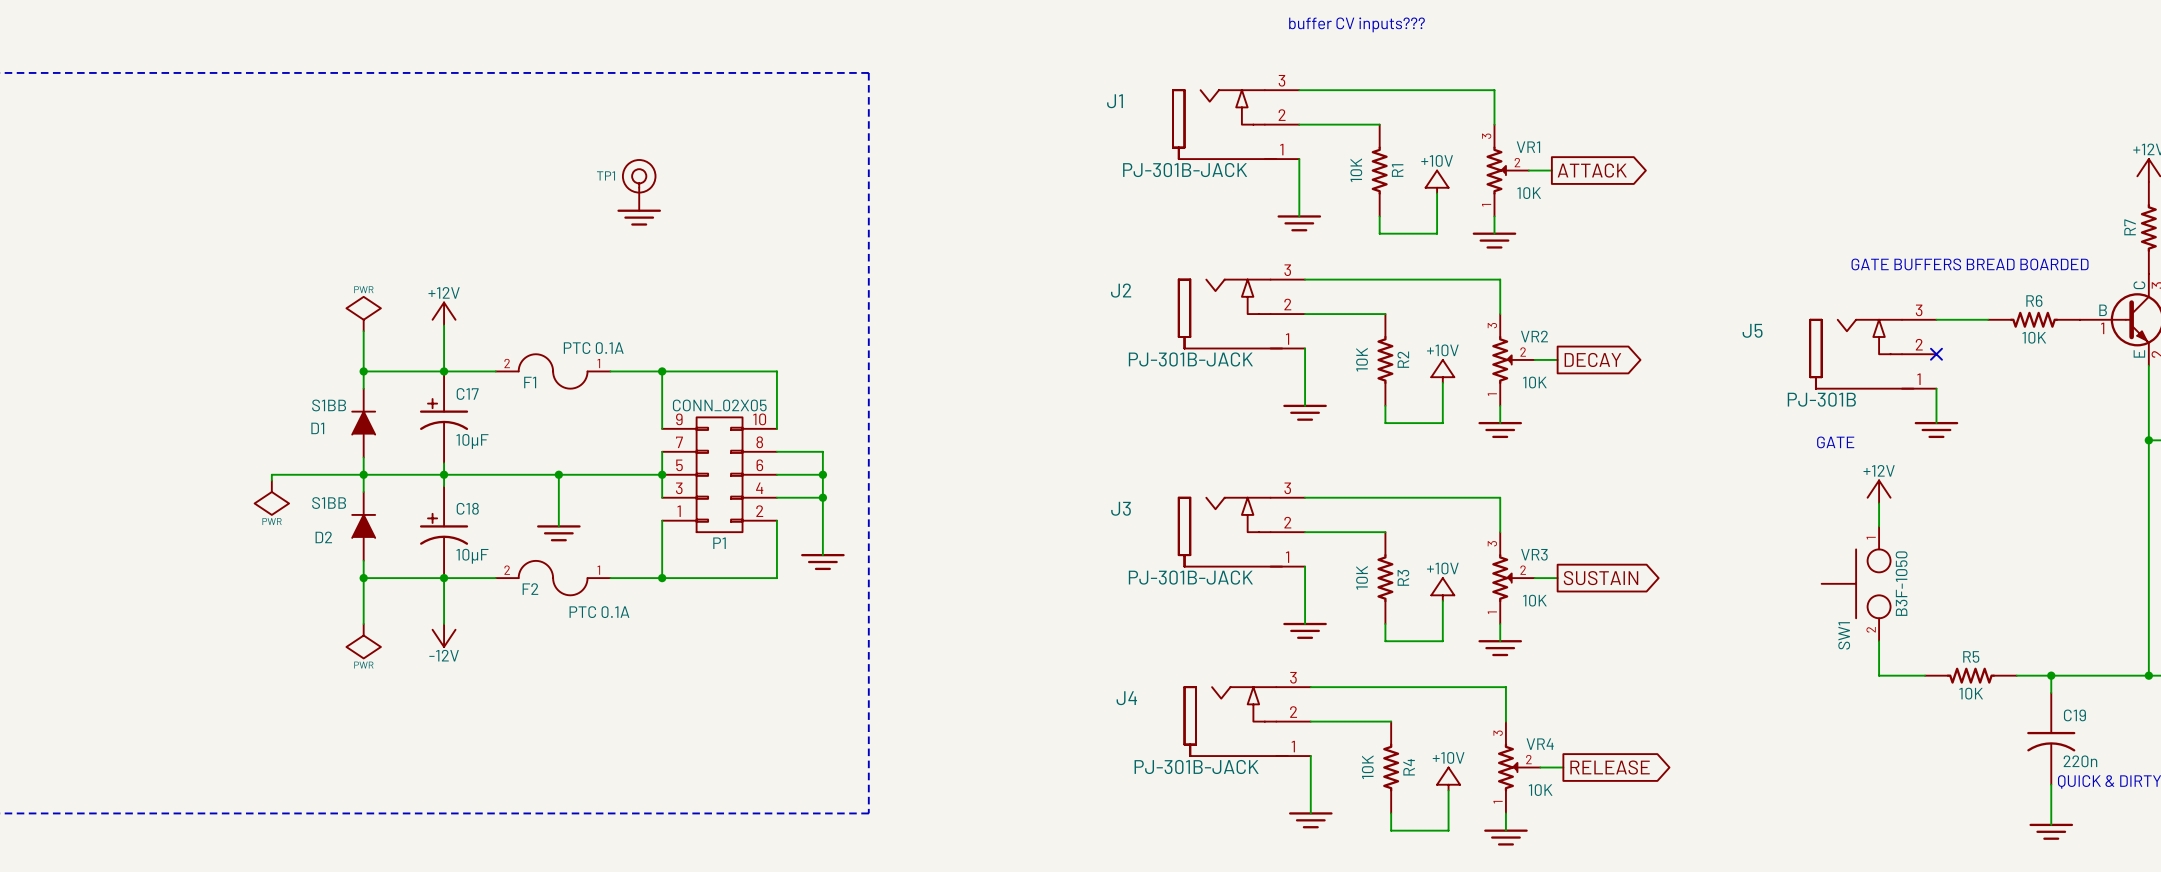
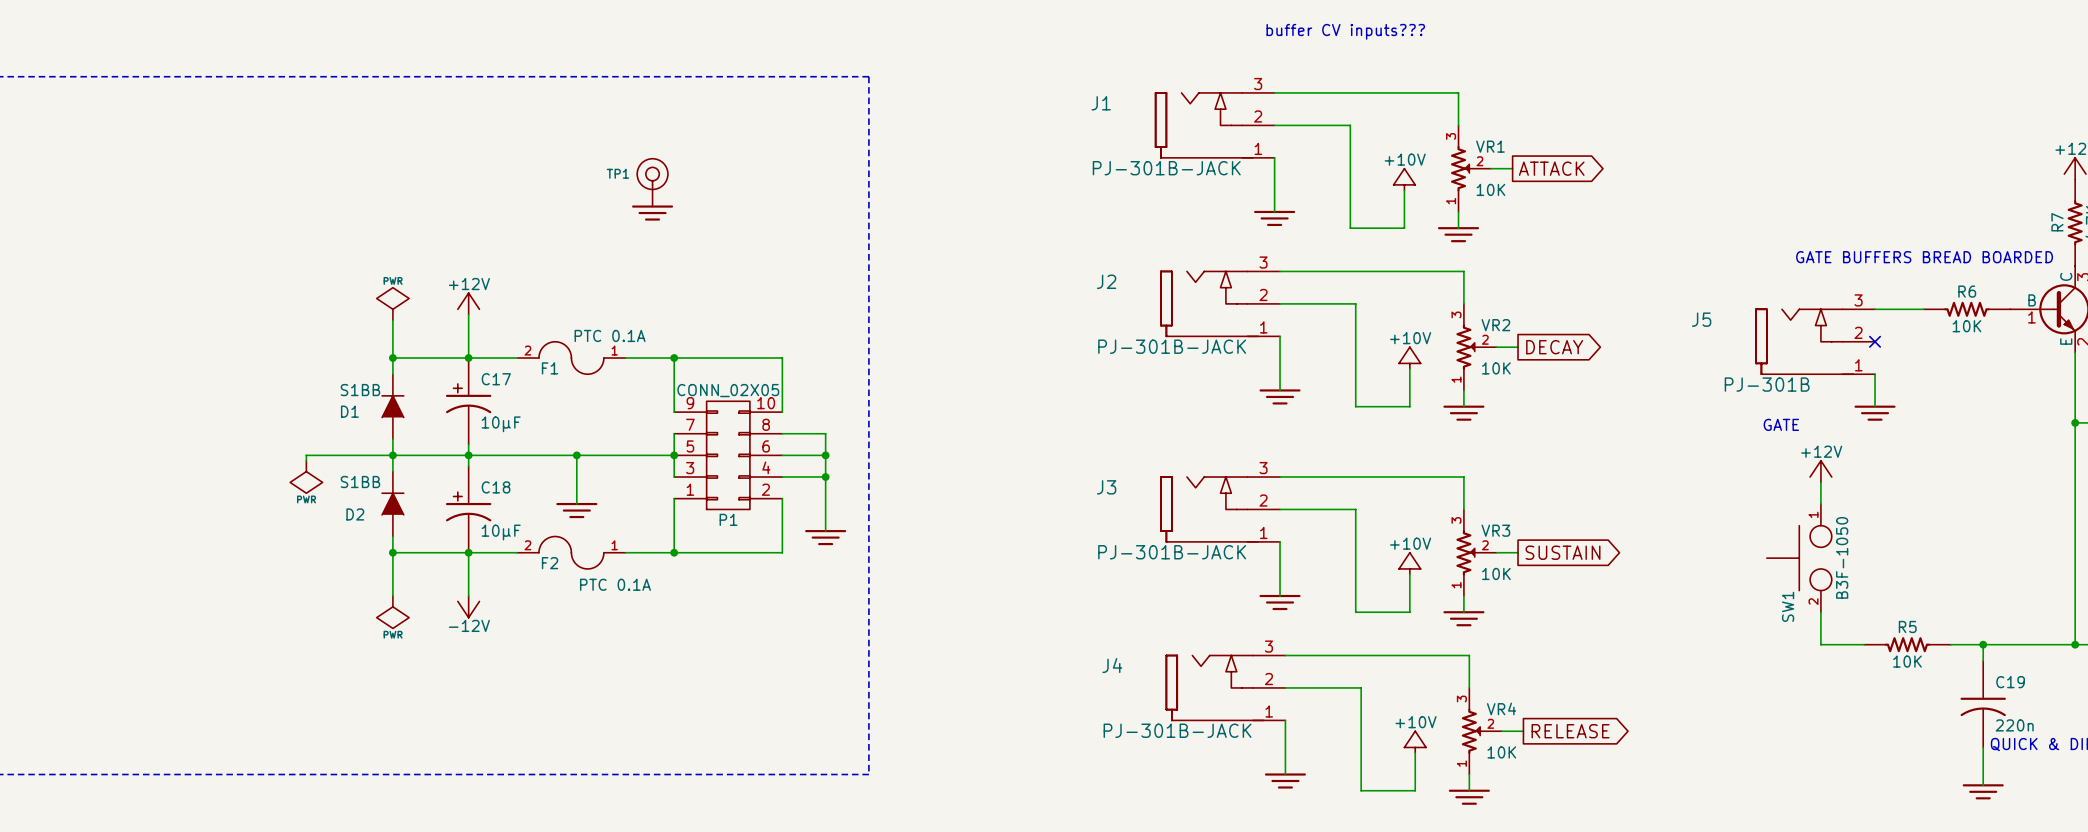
R1: 10K (1379, 170) -> none
R2: 10K (1385, 359) -> none
R3: 10K (1385, 578) -> none
R4: 10K (1391, 767) -> none

